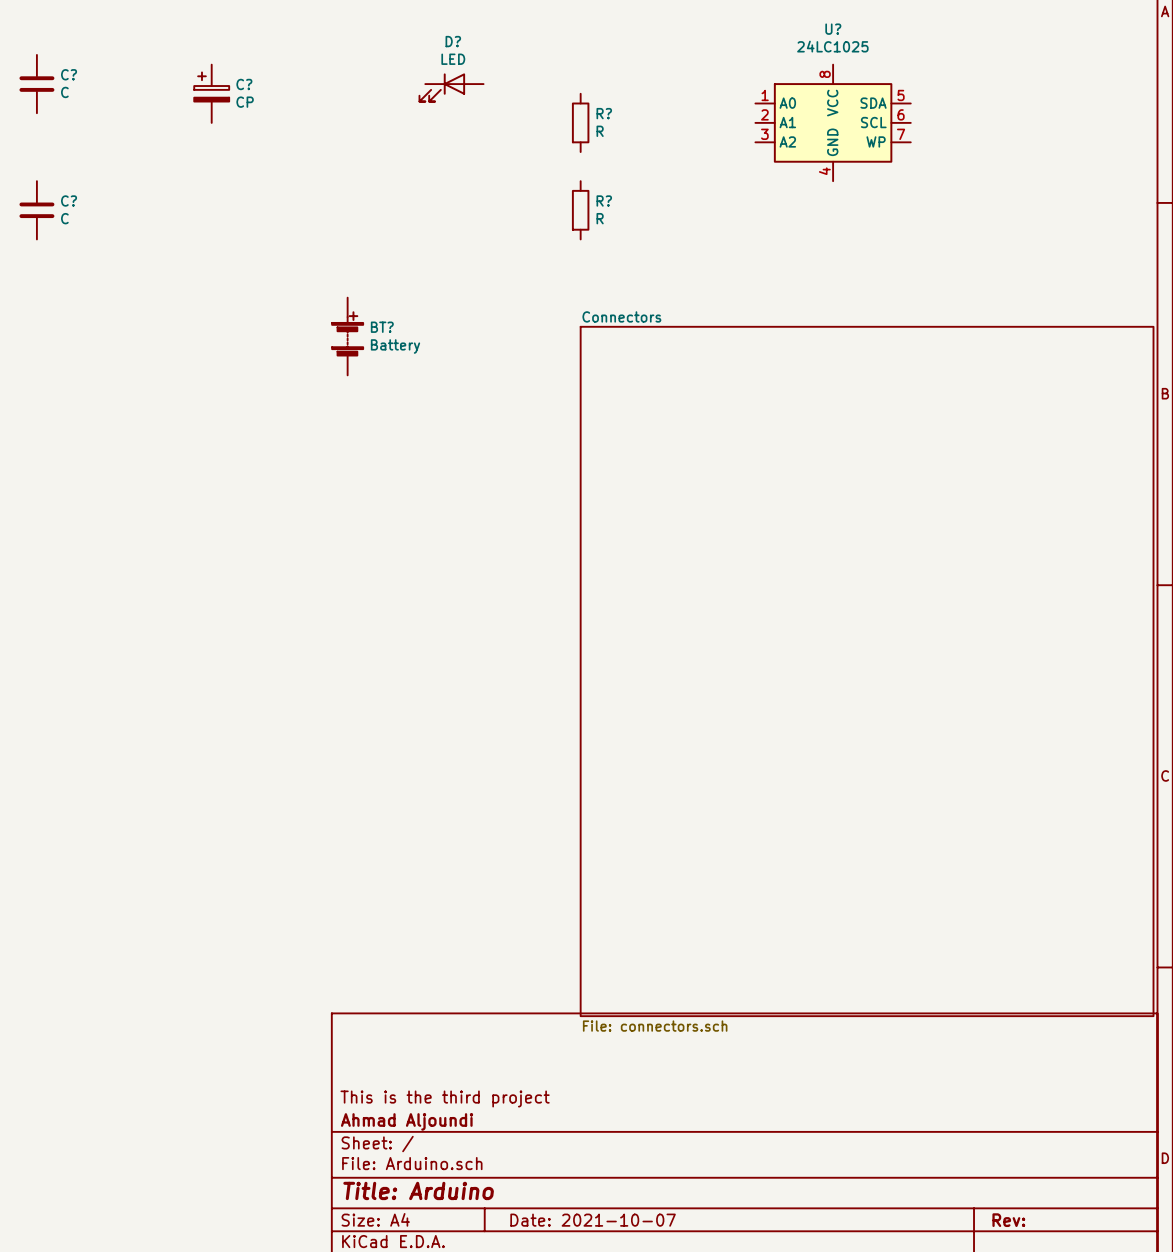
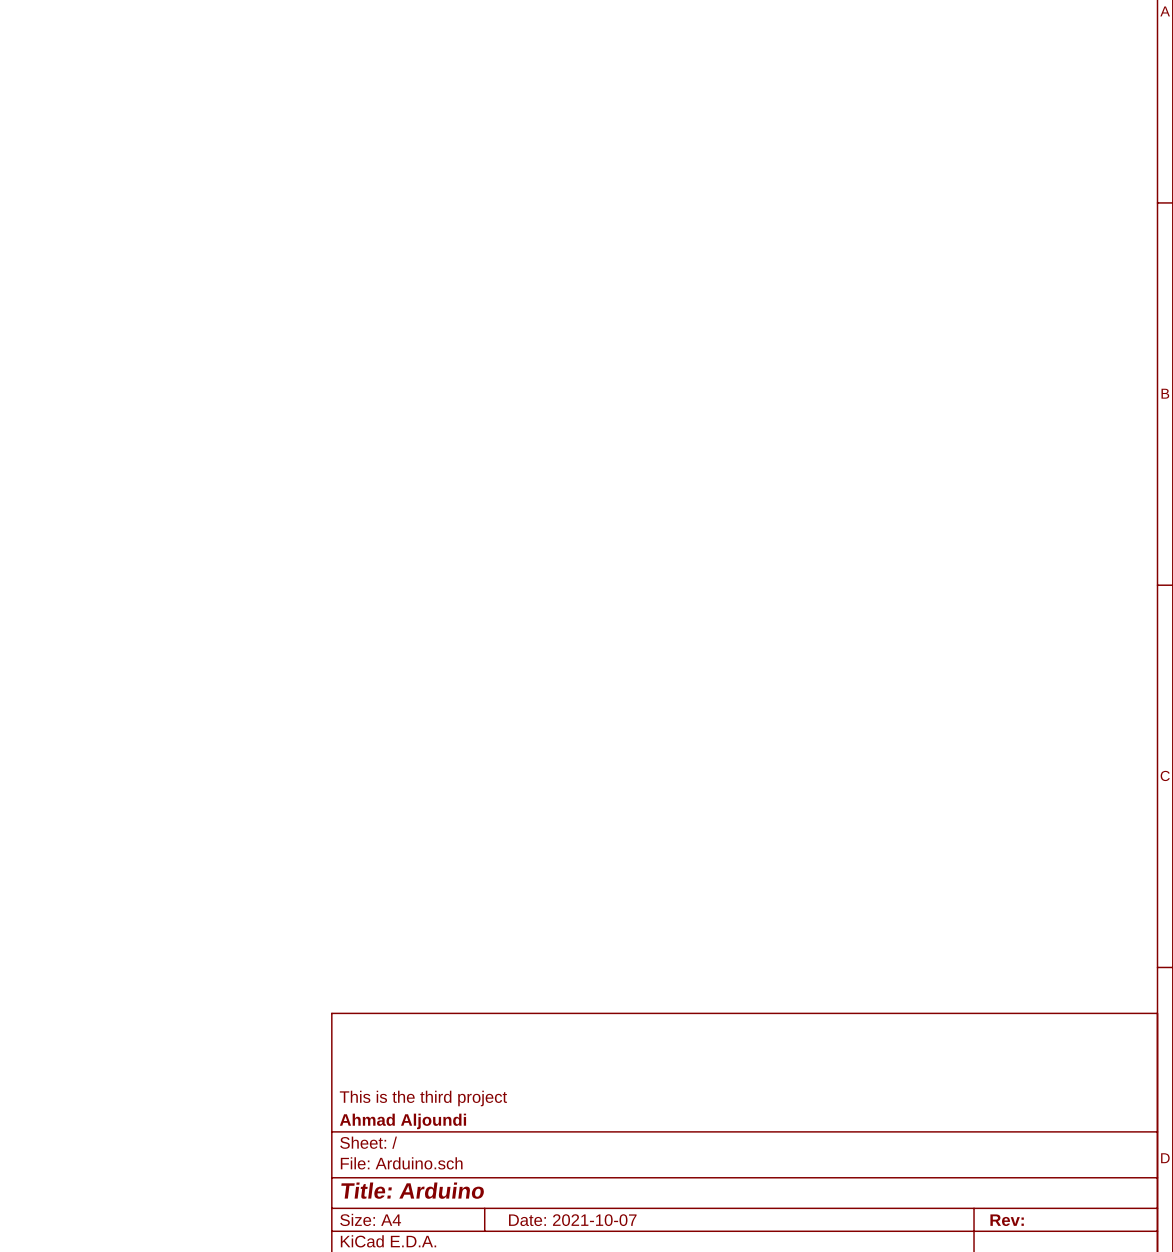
C?: C (36, 84) -> none
D?: LED (451, 87) -> none
C?: CP (211, 93) -> none
R?: R (580, 122) -> none
U?: 24LC1025 (833, 122) -> none
C?: C (36, 210) -> none
R?: R (580, 210) -> none
BT?: Battery (347, 336) -> none
sheet Connectors: File: connectors.sch (867, 671) -> none

